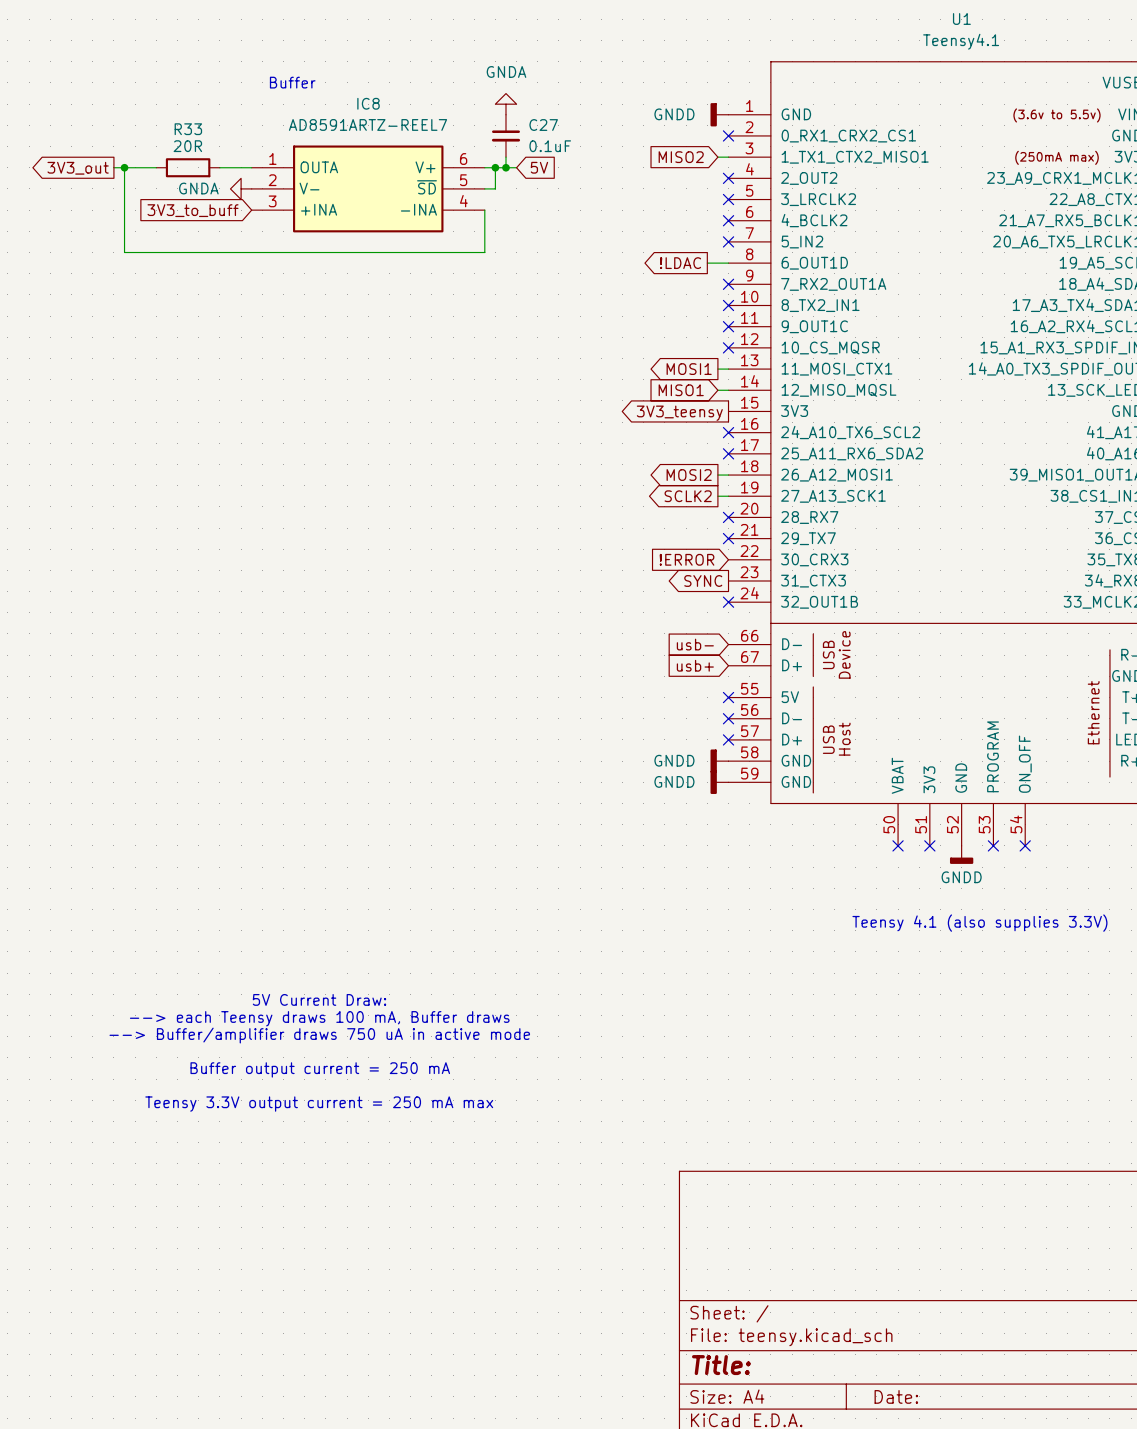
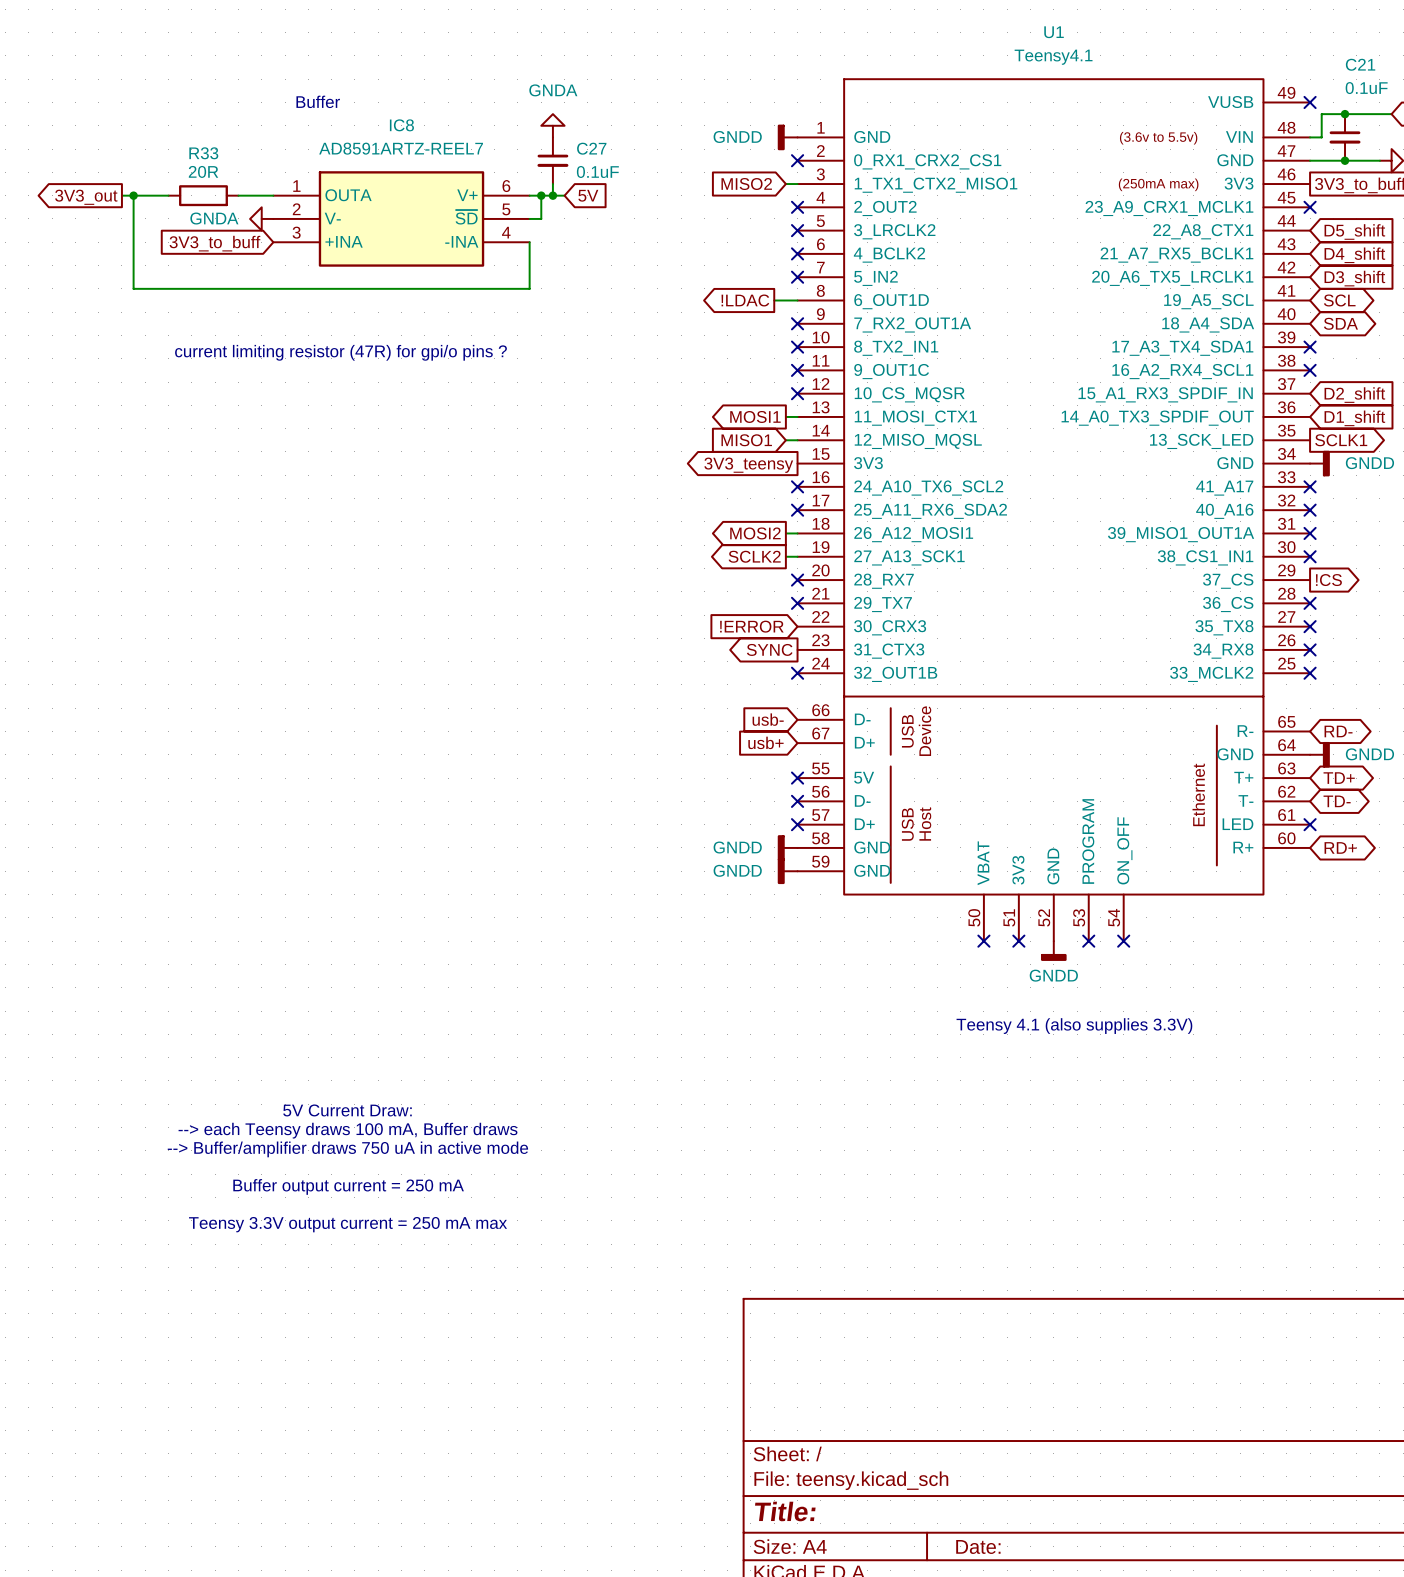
text: none -> current limiting resistor (47R) for gpi/o pins ? (340, 352)

